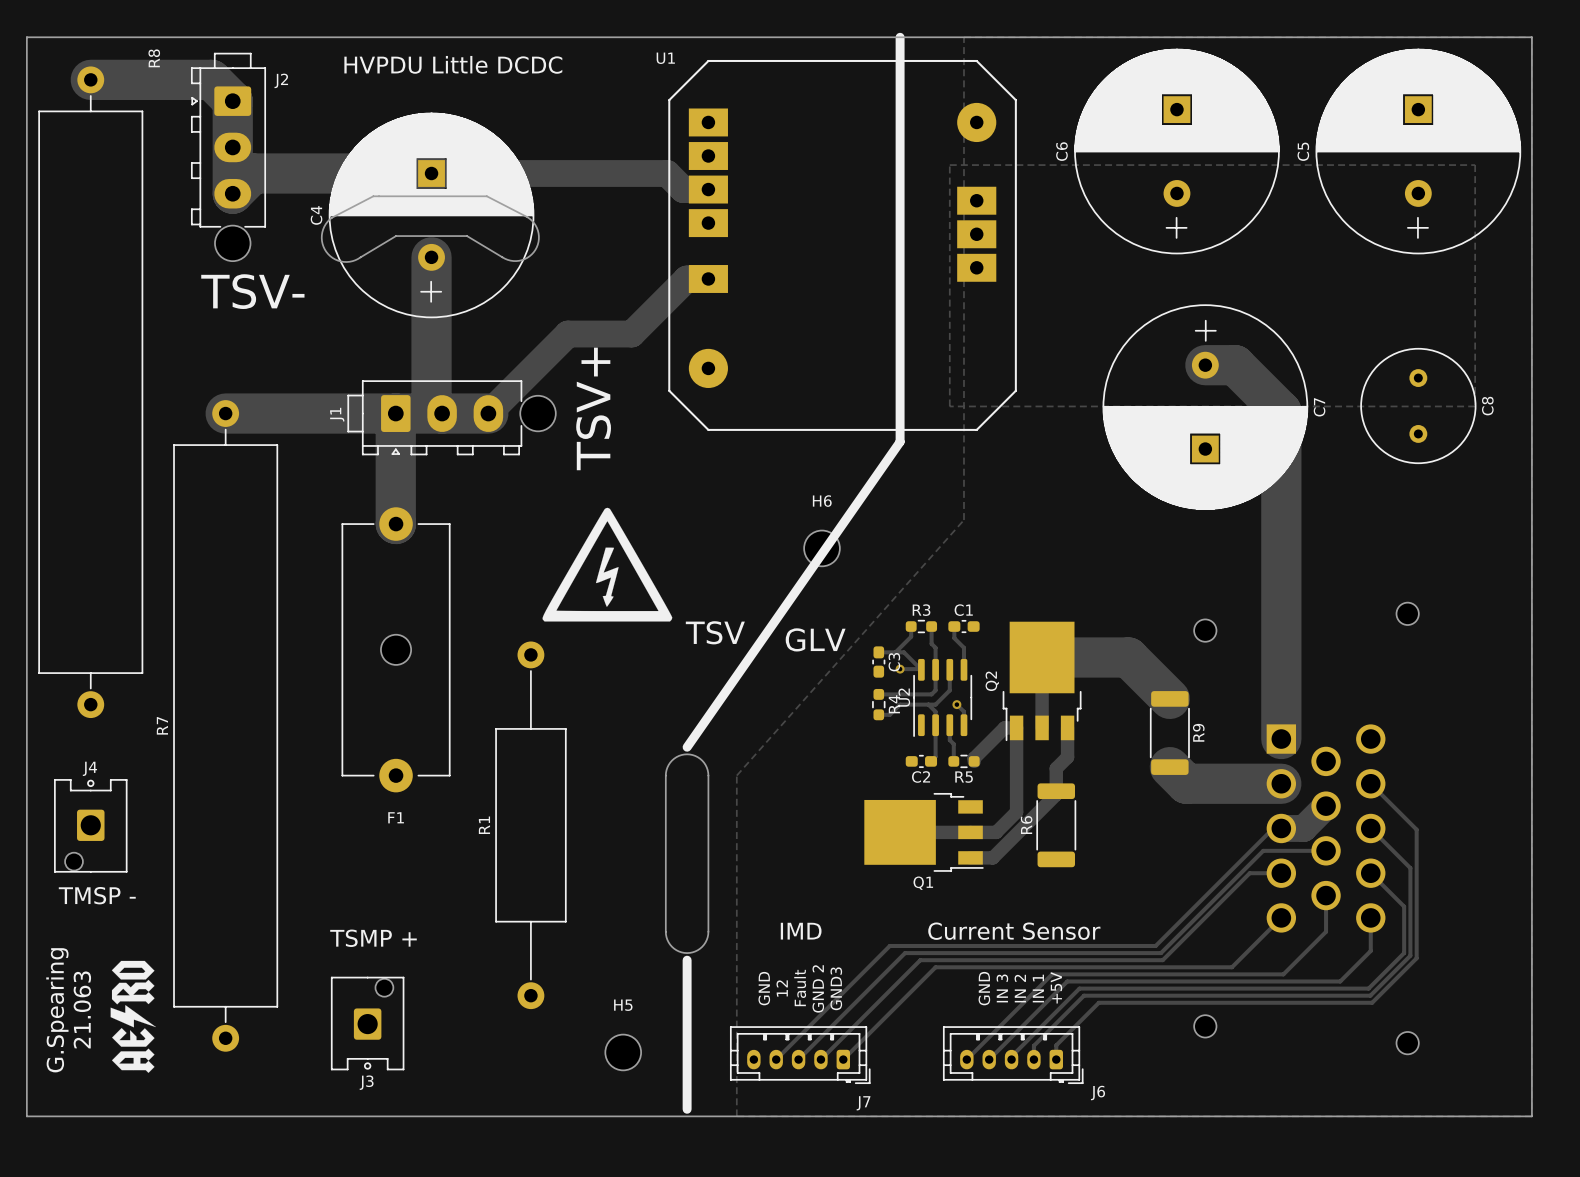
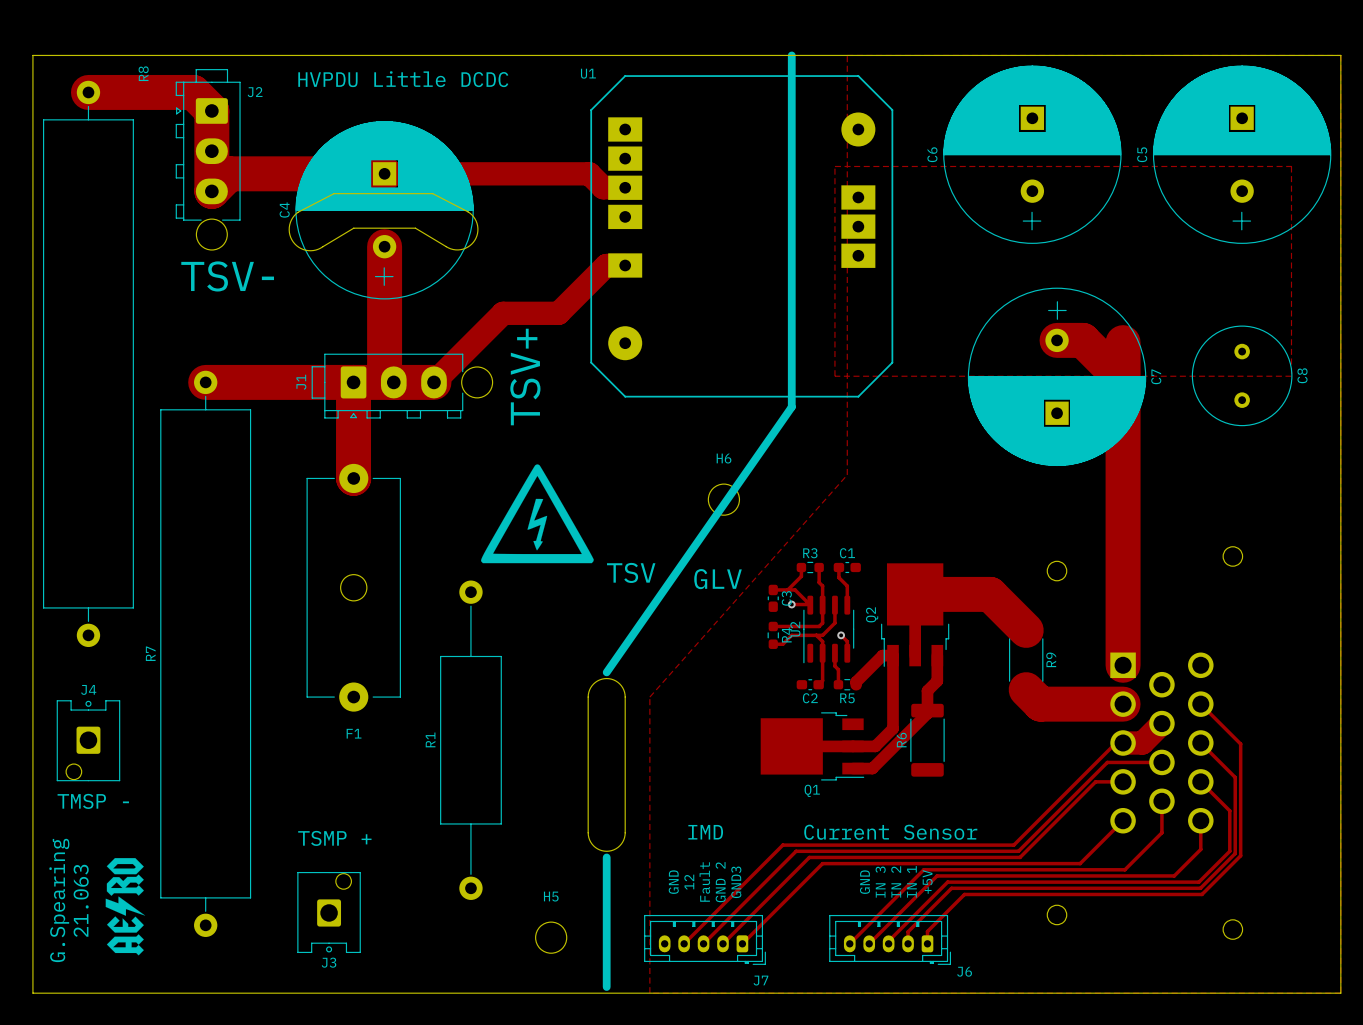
track: none -> (1123, 342) (1123, 380)

